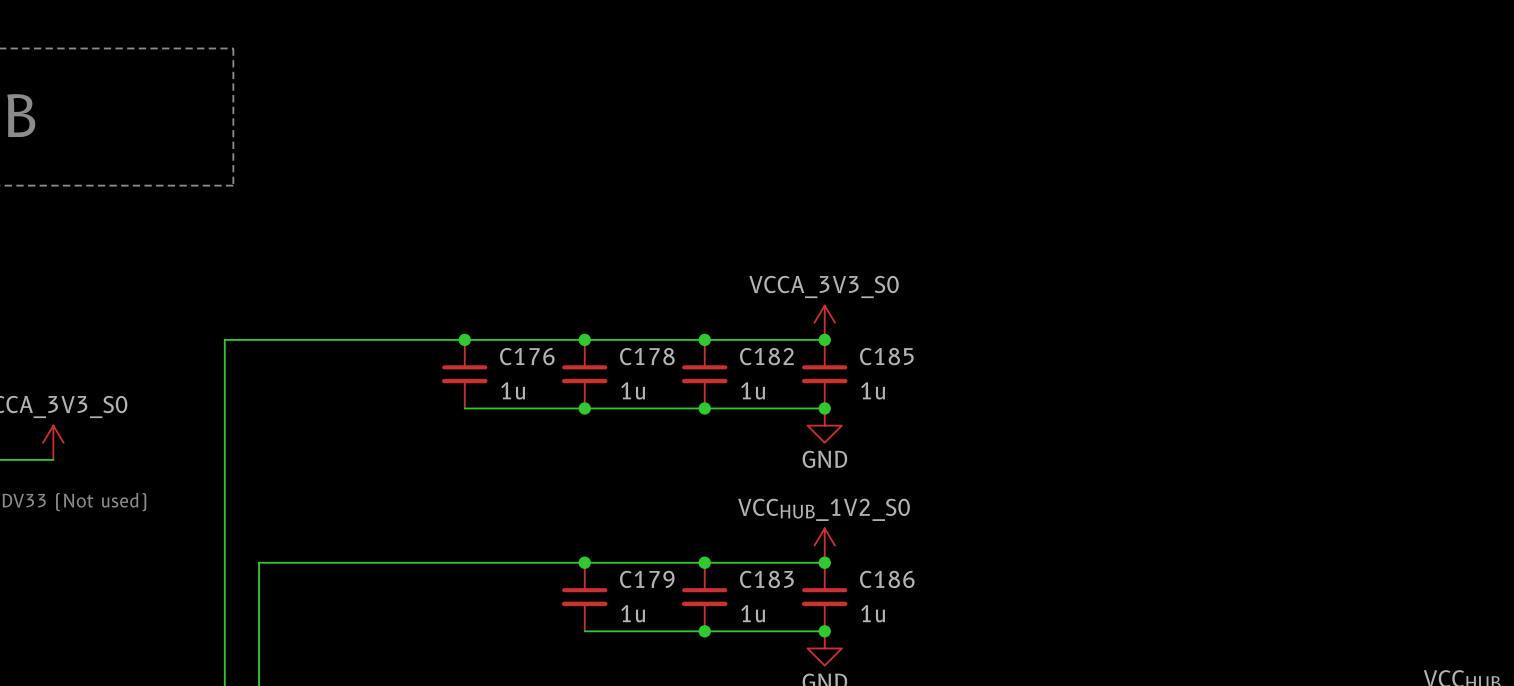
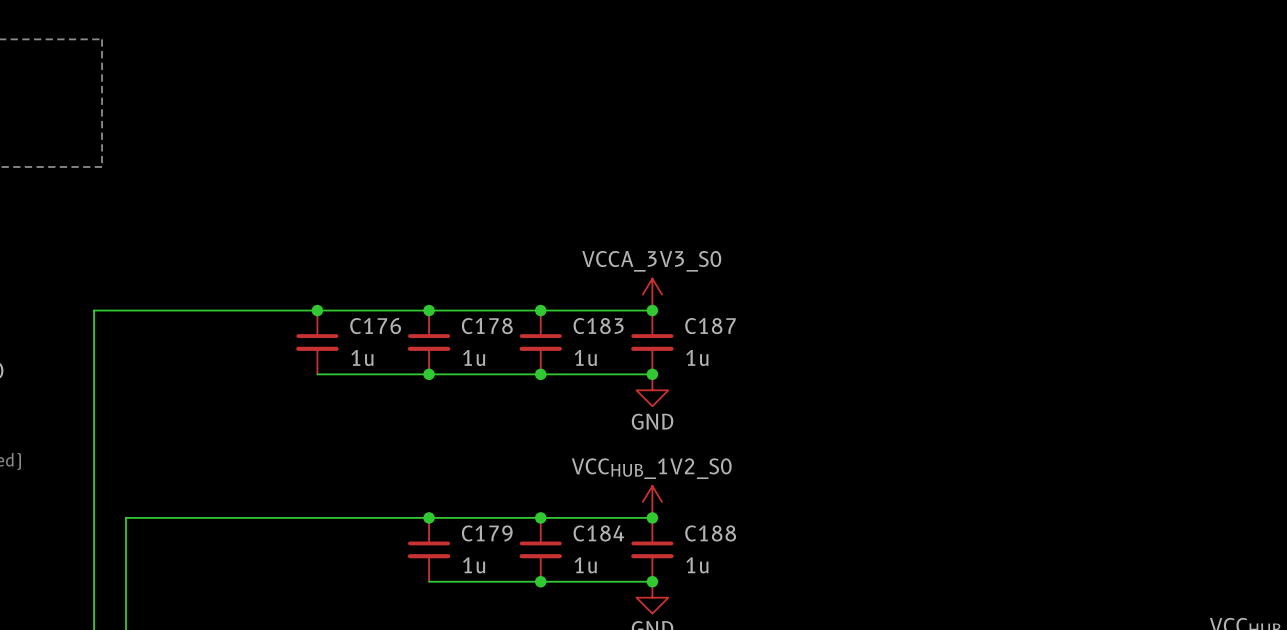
C182 name: C182 (766, 356) -> C183 (598, 326)
C185 name: C185 (886, 356) -> C187 (710, 326)
C183 name: C183 (766, 579) -> C184 (598, 533)
C186 name: C186 (887, 579) -> C188 (710, 533)

